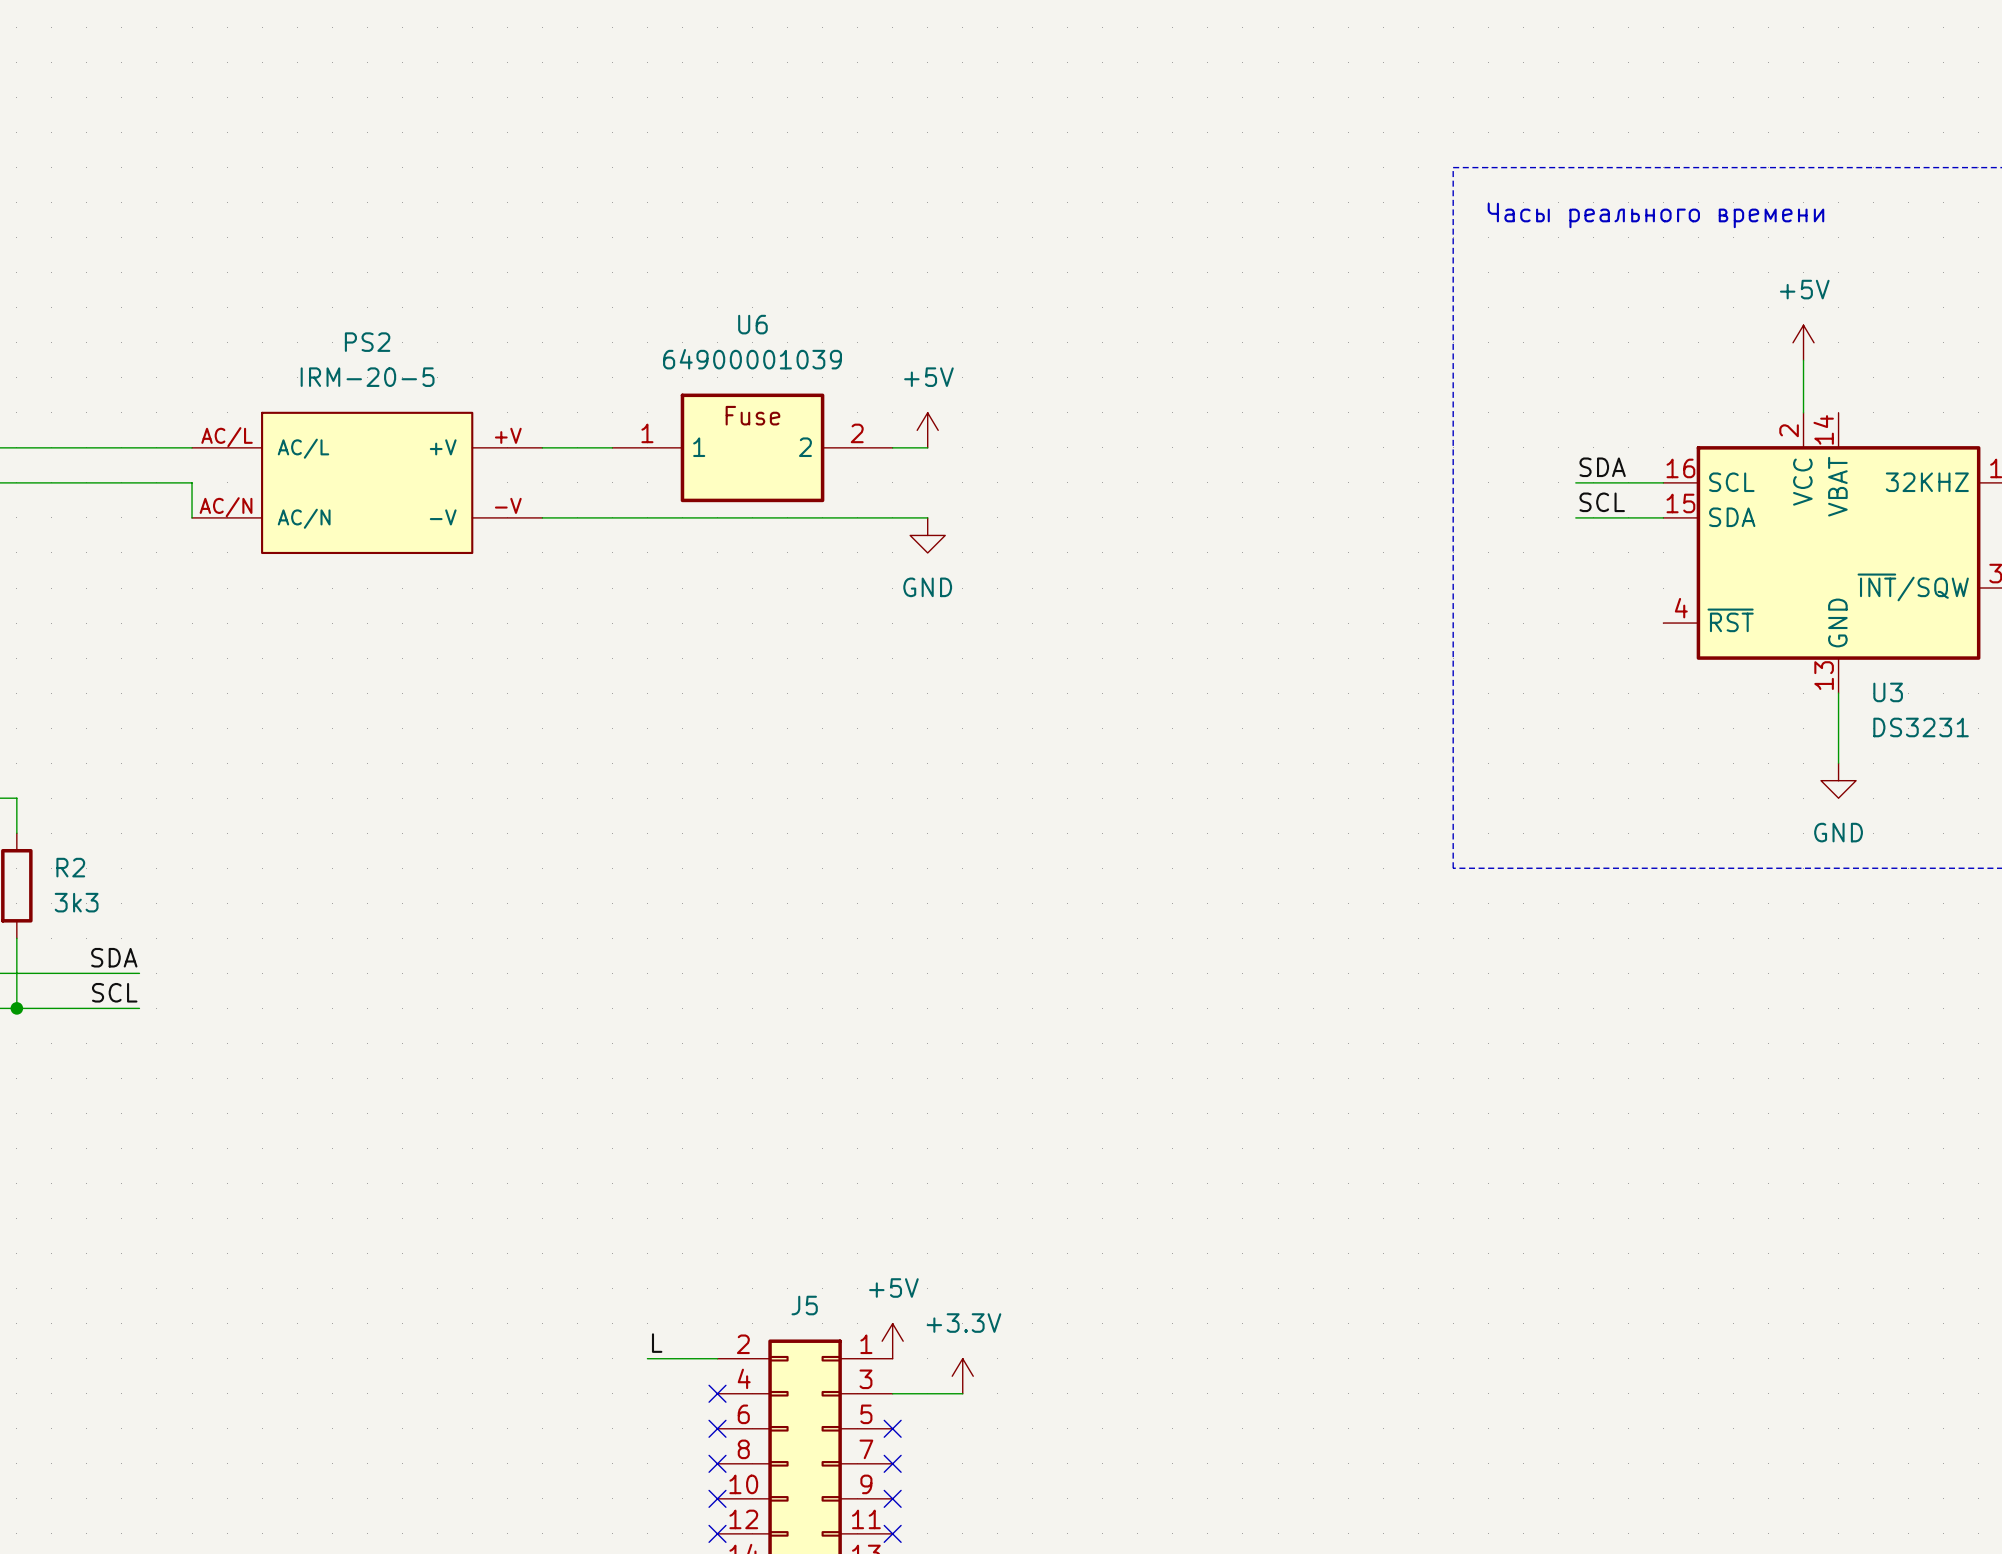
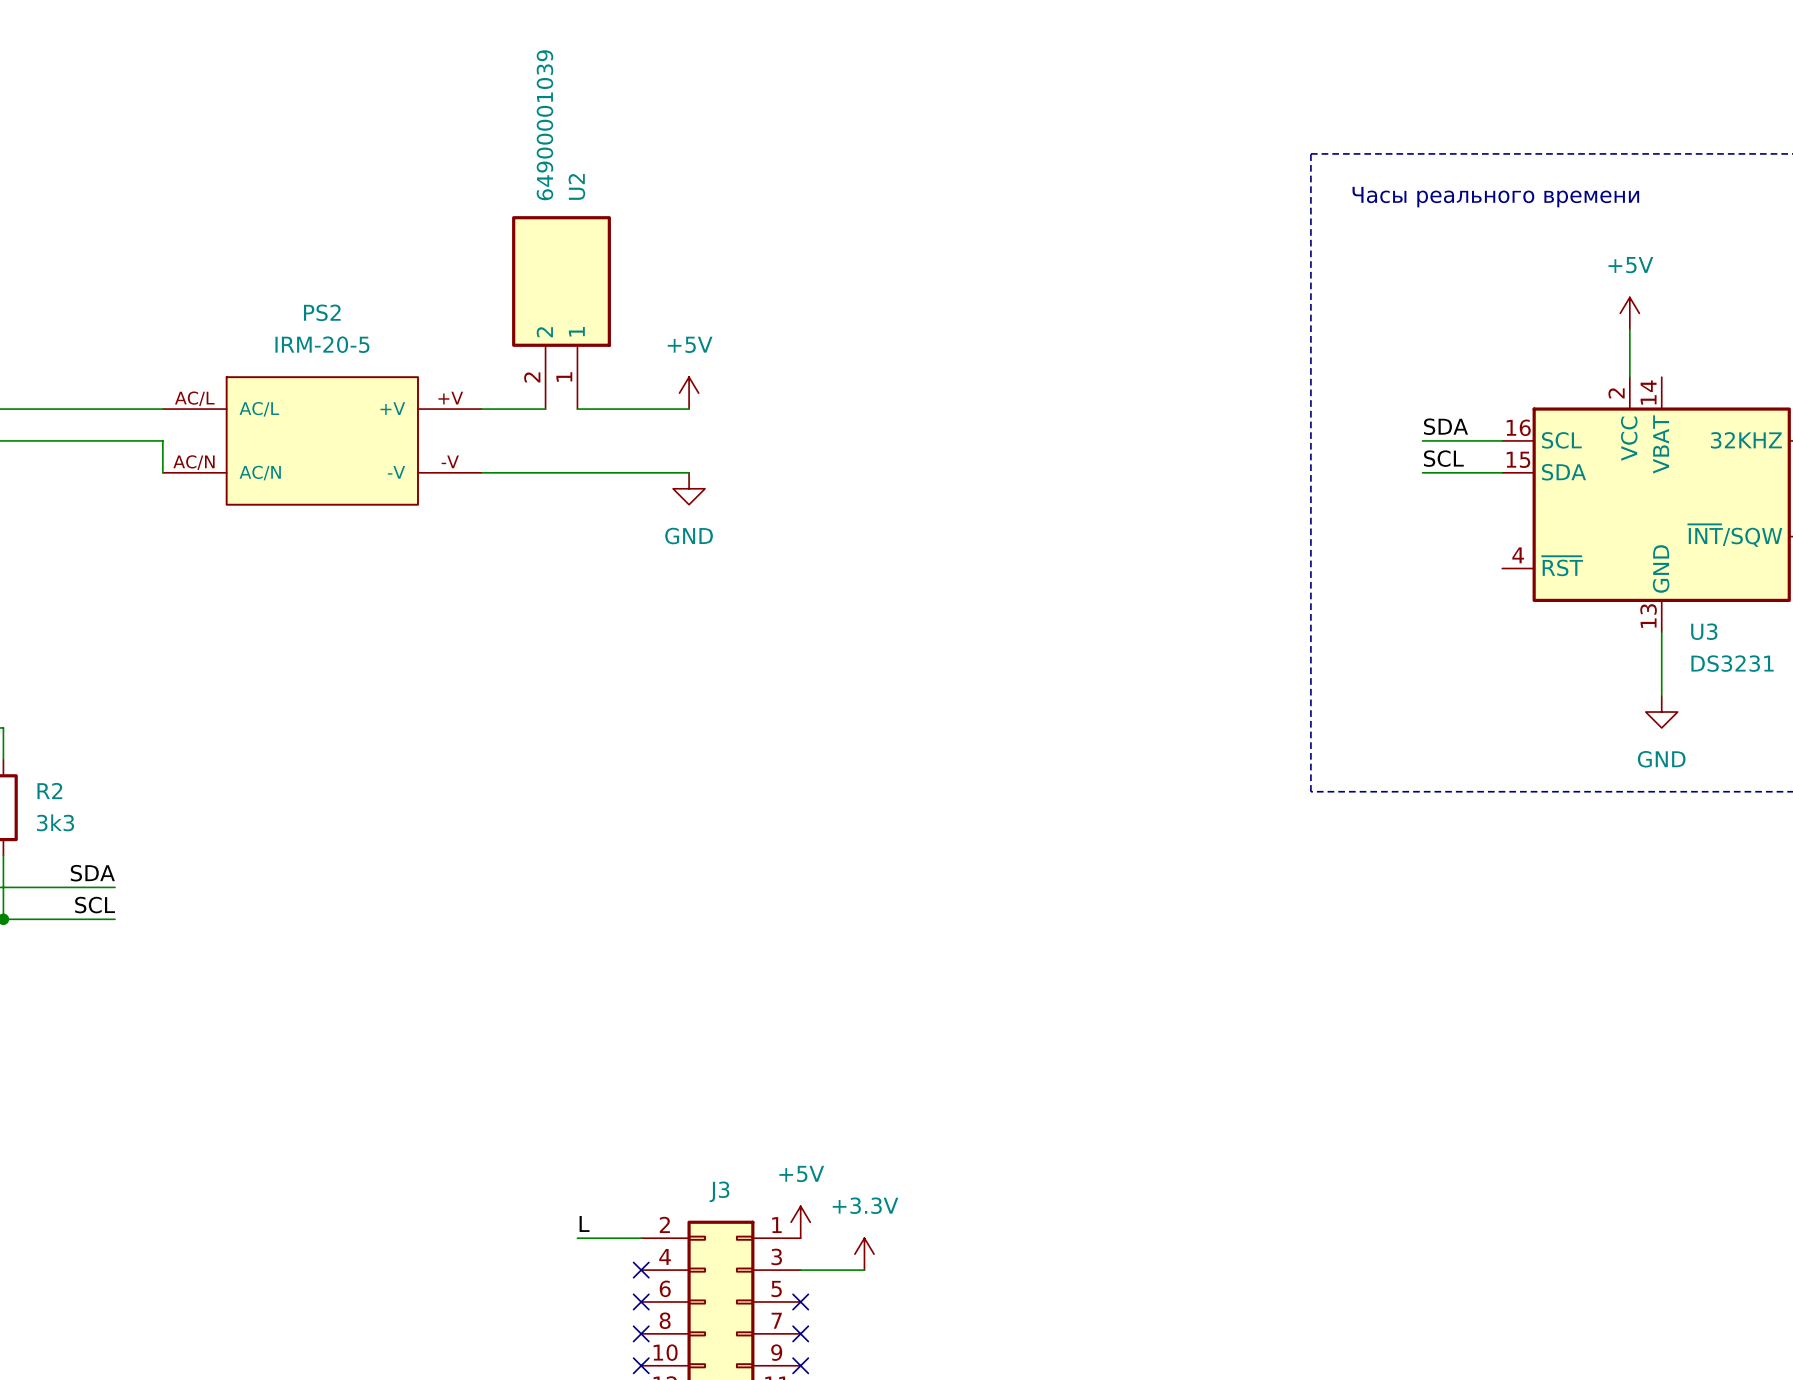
U2: none -> 64900001039 (561, 312)
power symbol position: +5V (927, 430) -> +5V (689, 393)
U6: 64900001039 (752, 447) -> none
wire: (892, 447) (927, 447) -> none
wire: (770, 517) (927, 517) -> none
power symbol position: GND (927, 535) -> GND (689, 488)
J5 name: J5 (804, 1305) -> J3 (719, 1191)

